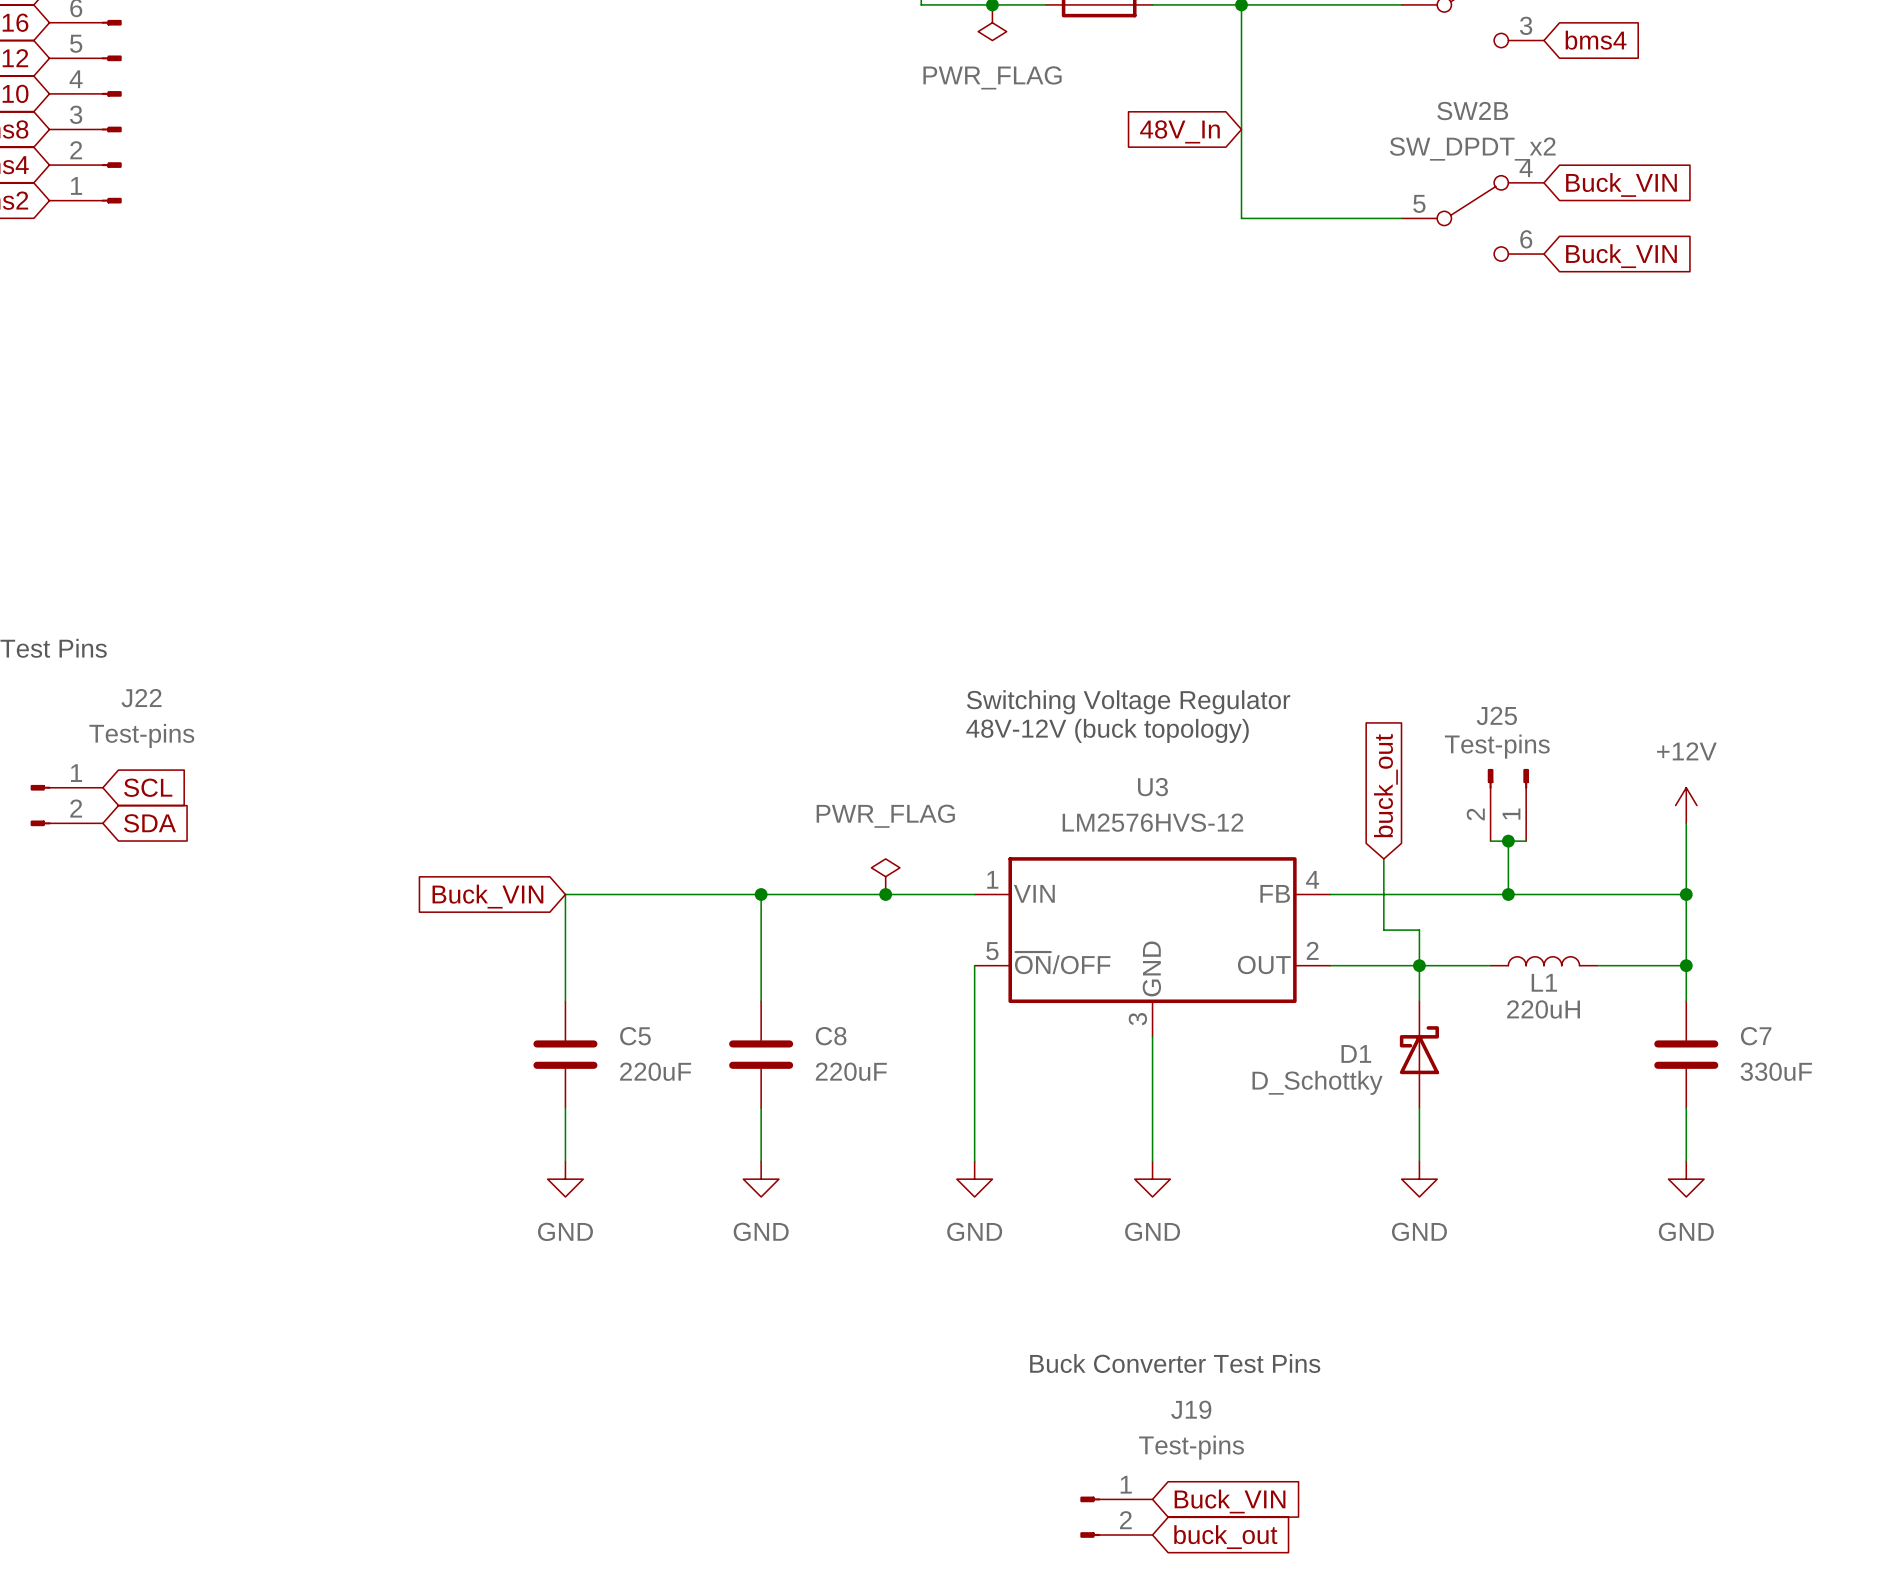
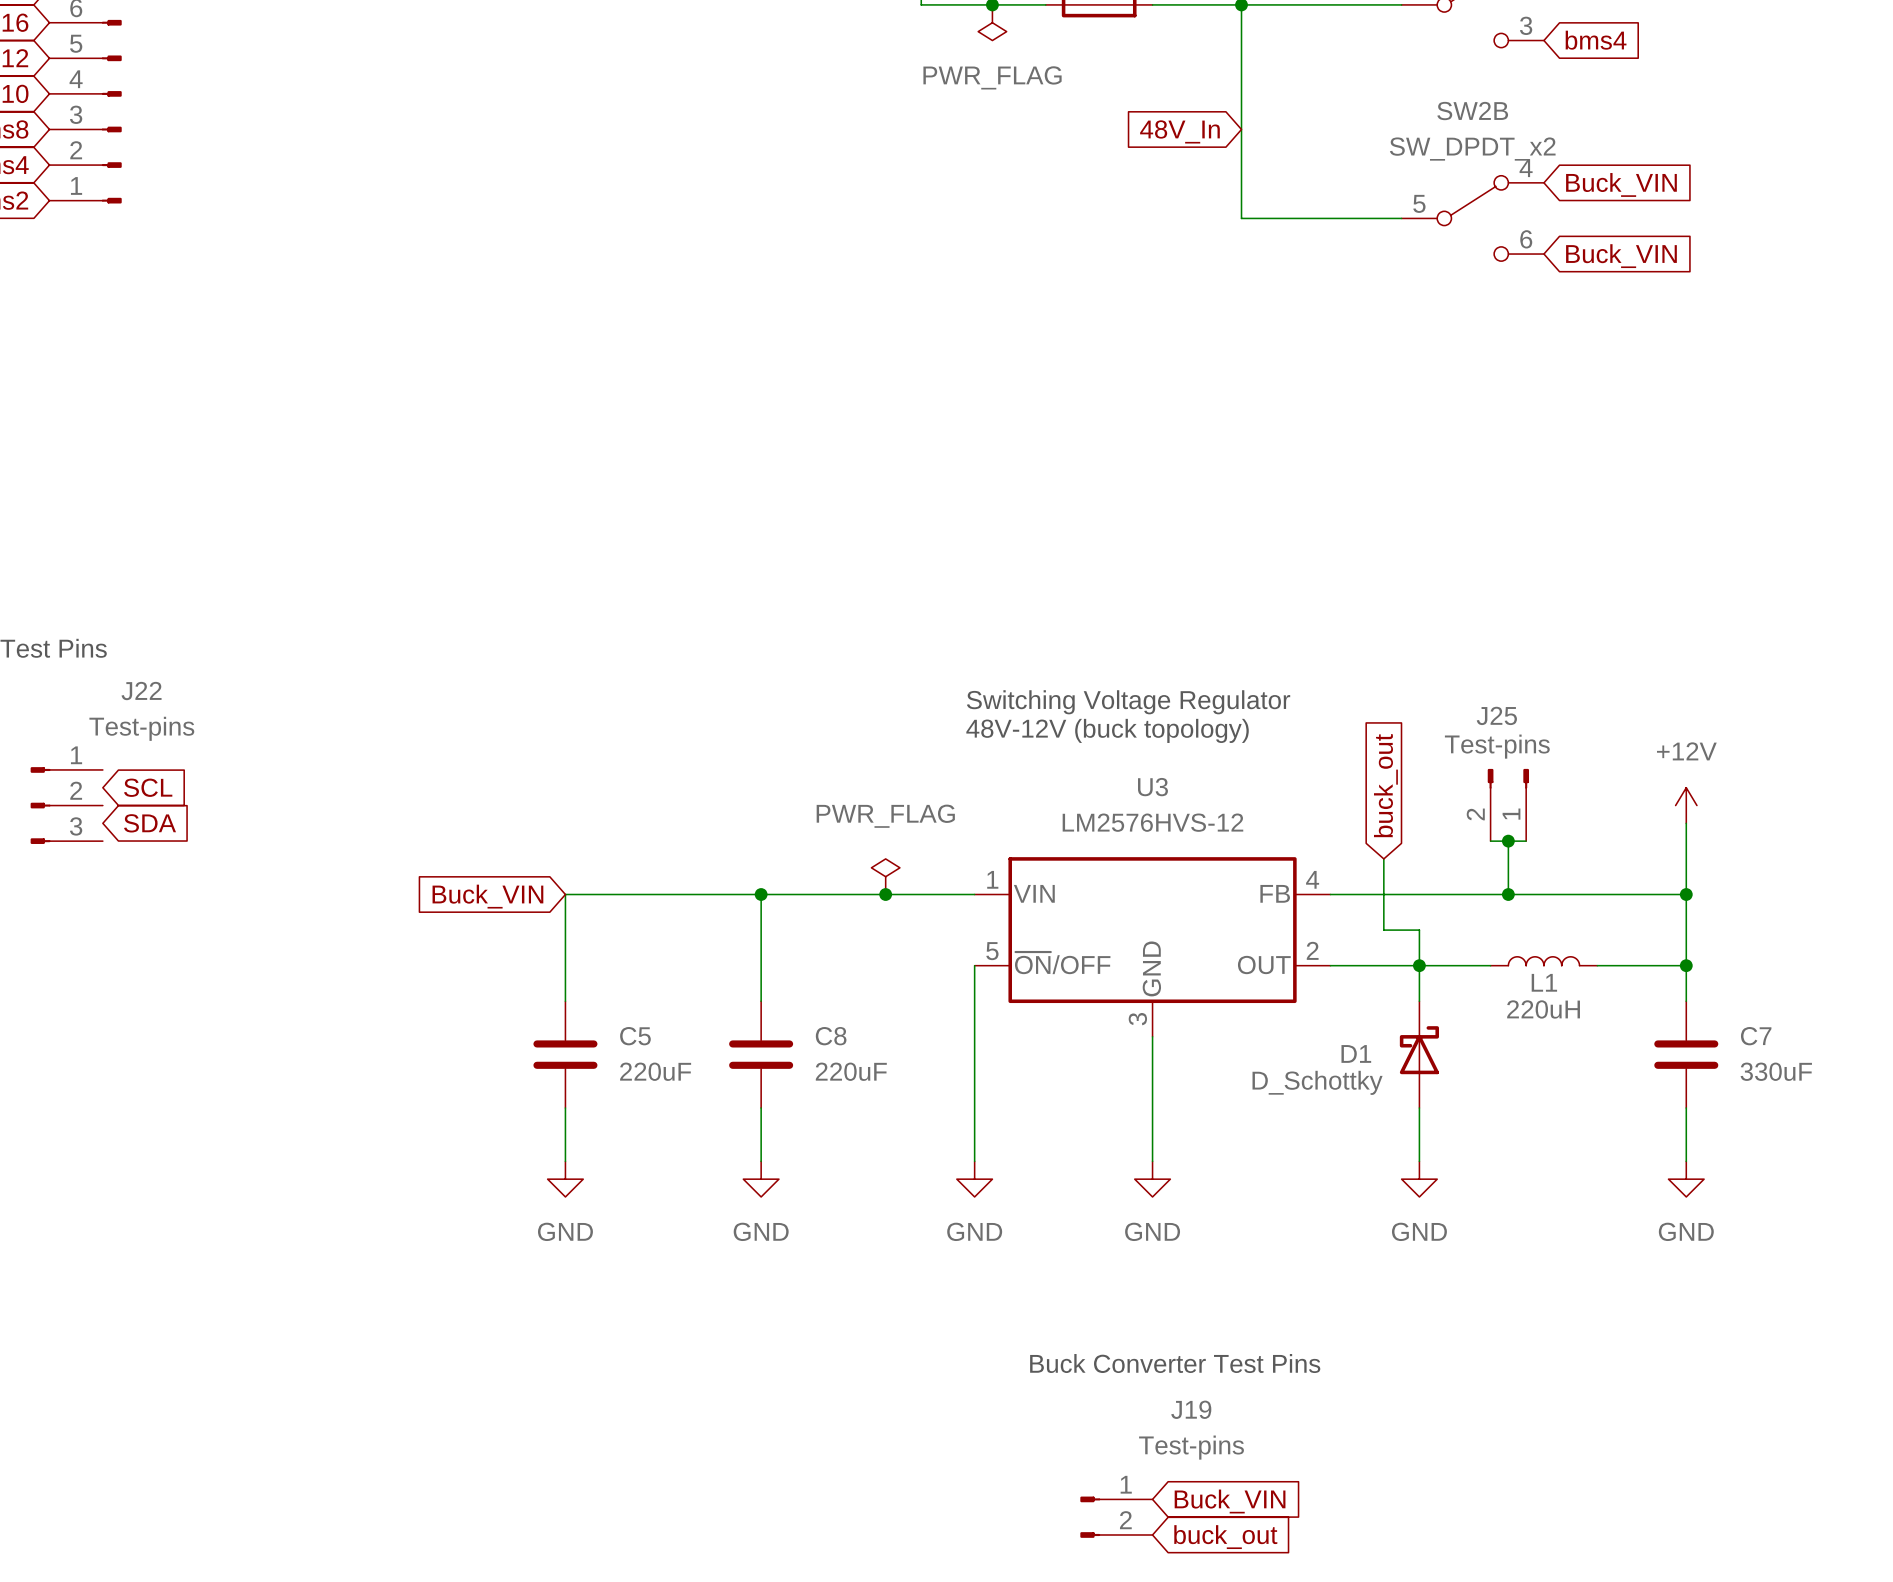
J22 symbol: [30, 784, 103, 827] -> [30, 767, 103, 844]

